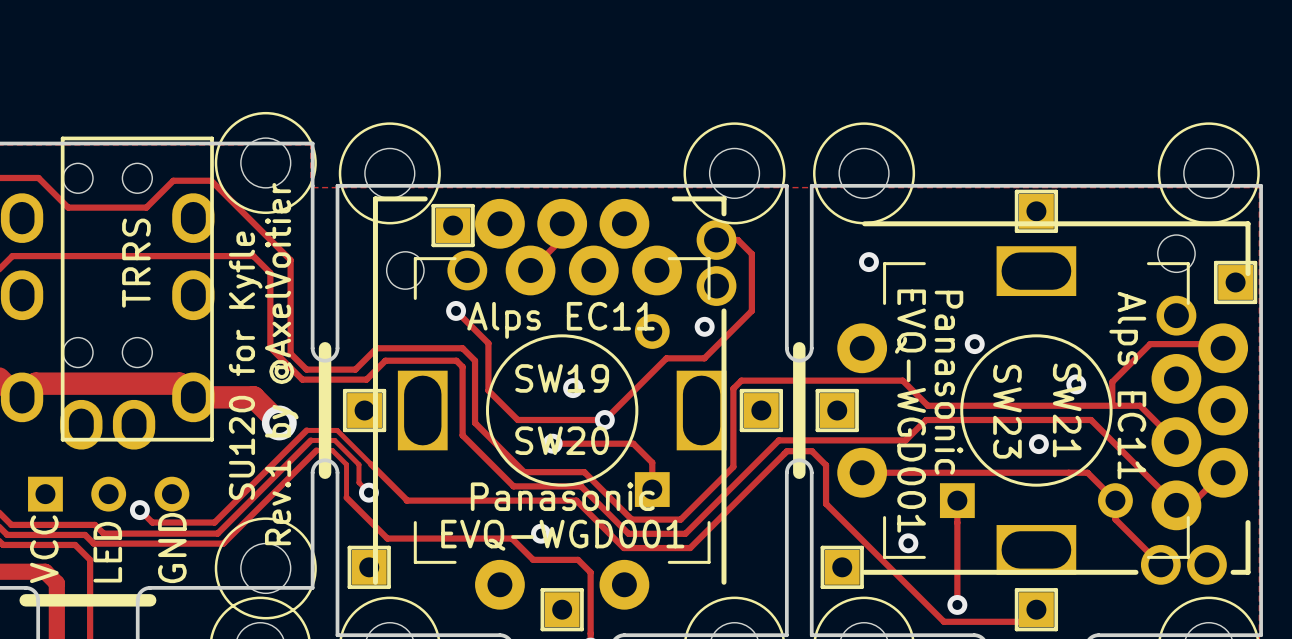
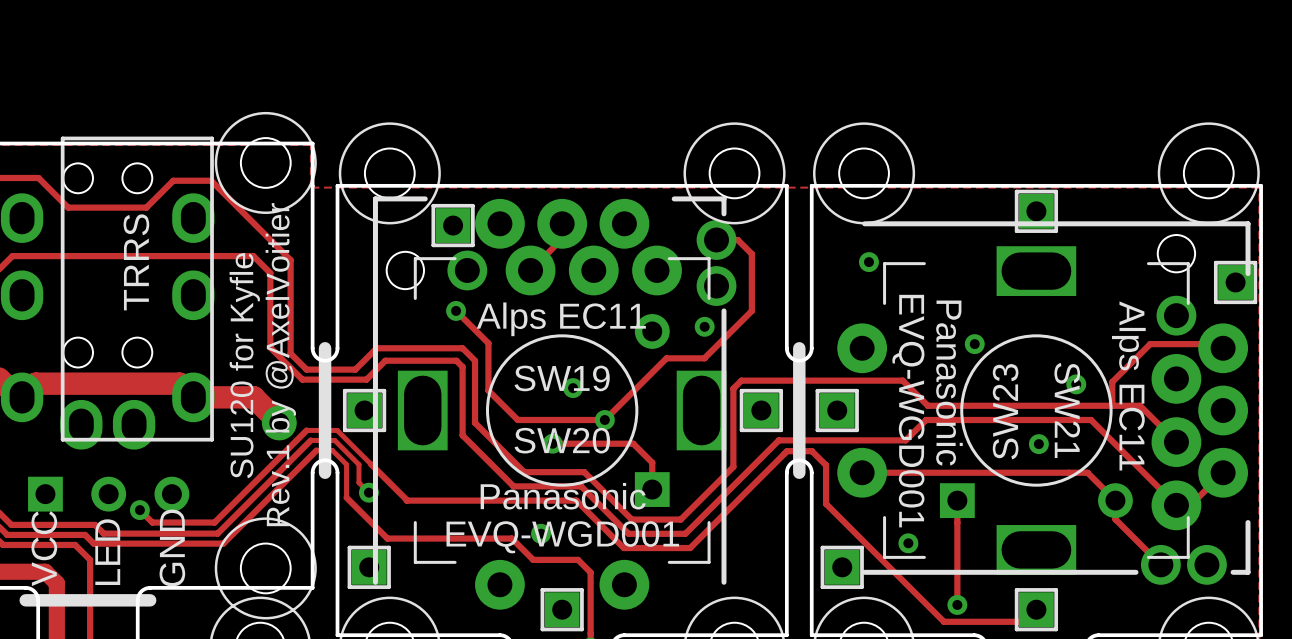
SW23 name rotation: 0° (1007, 411) -> 180° (1005, 411)

